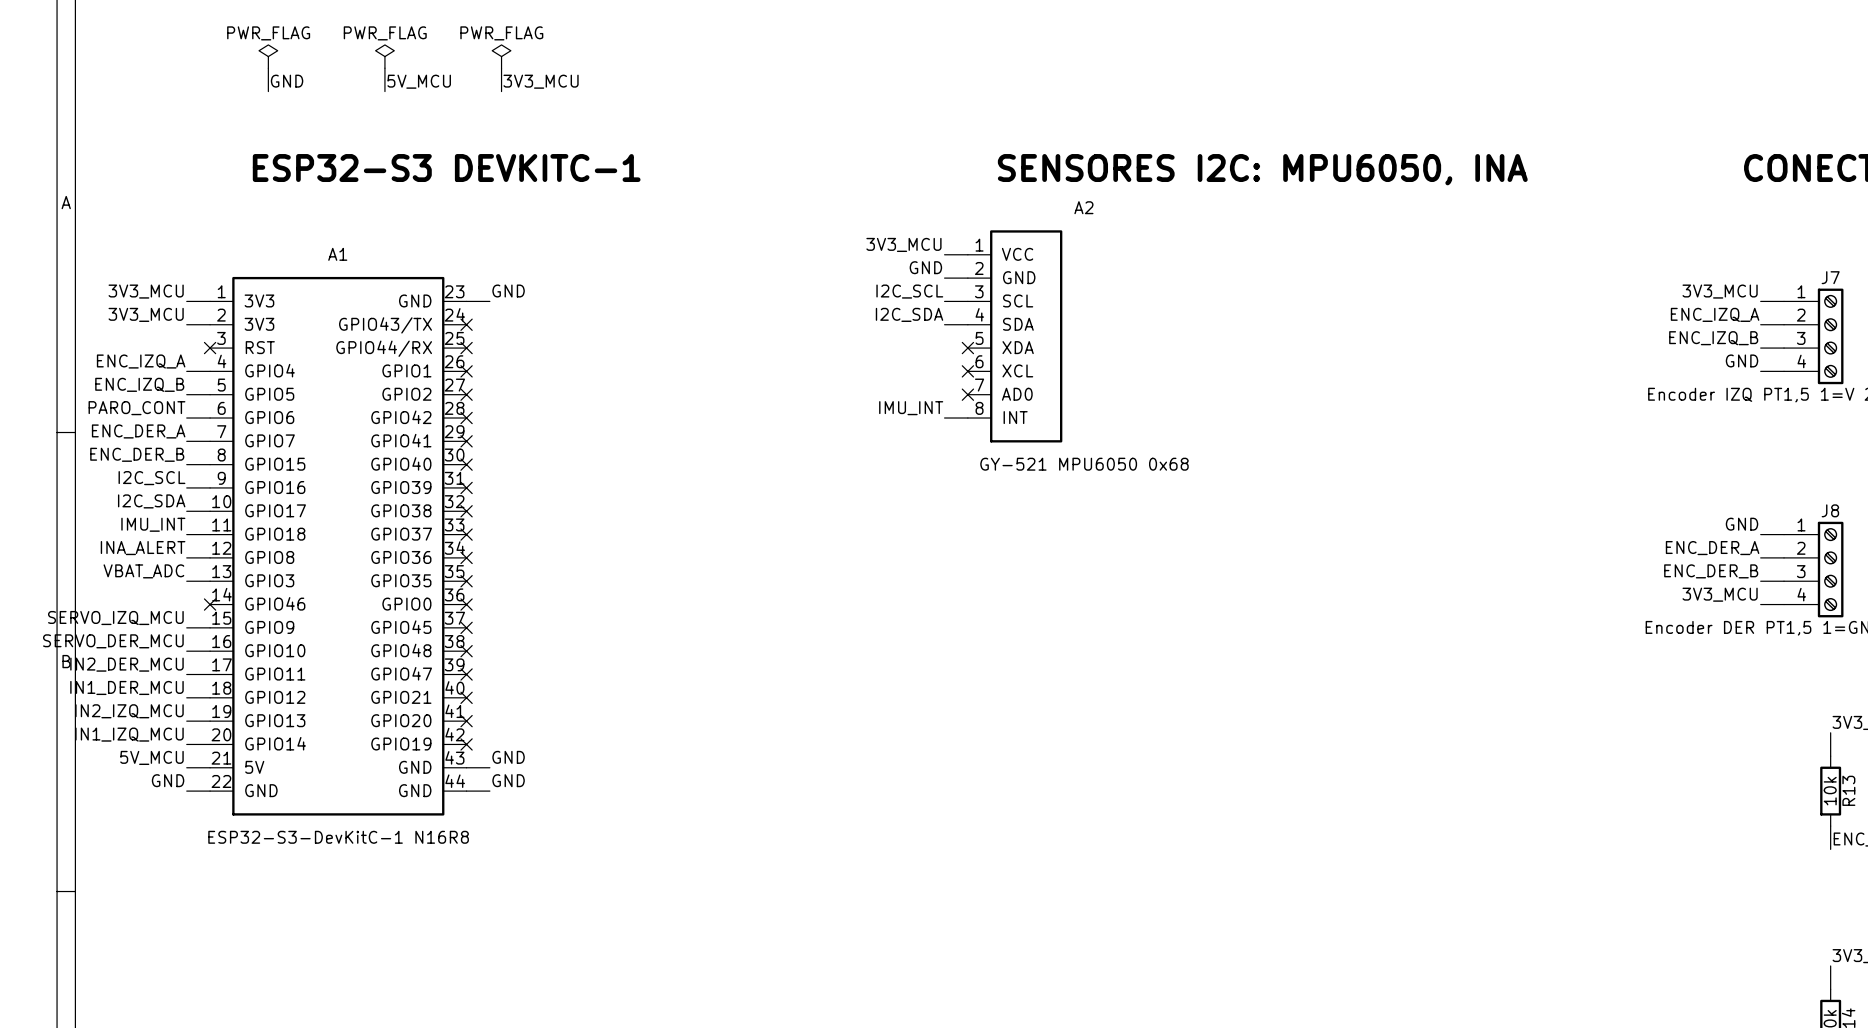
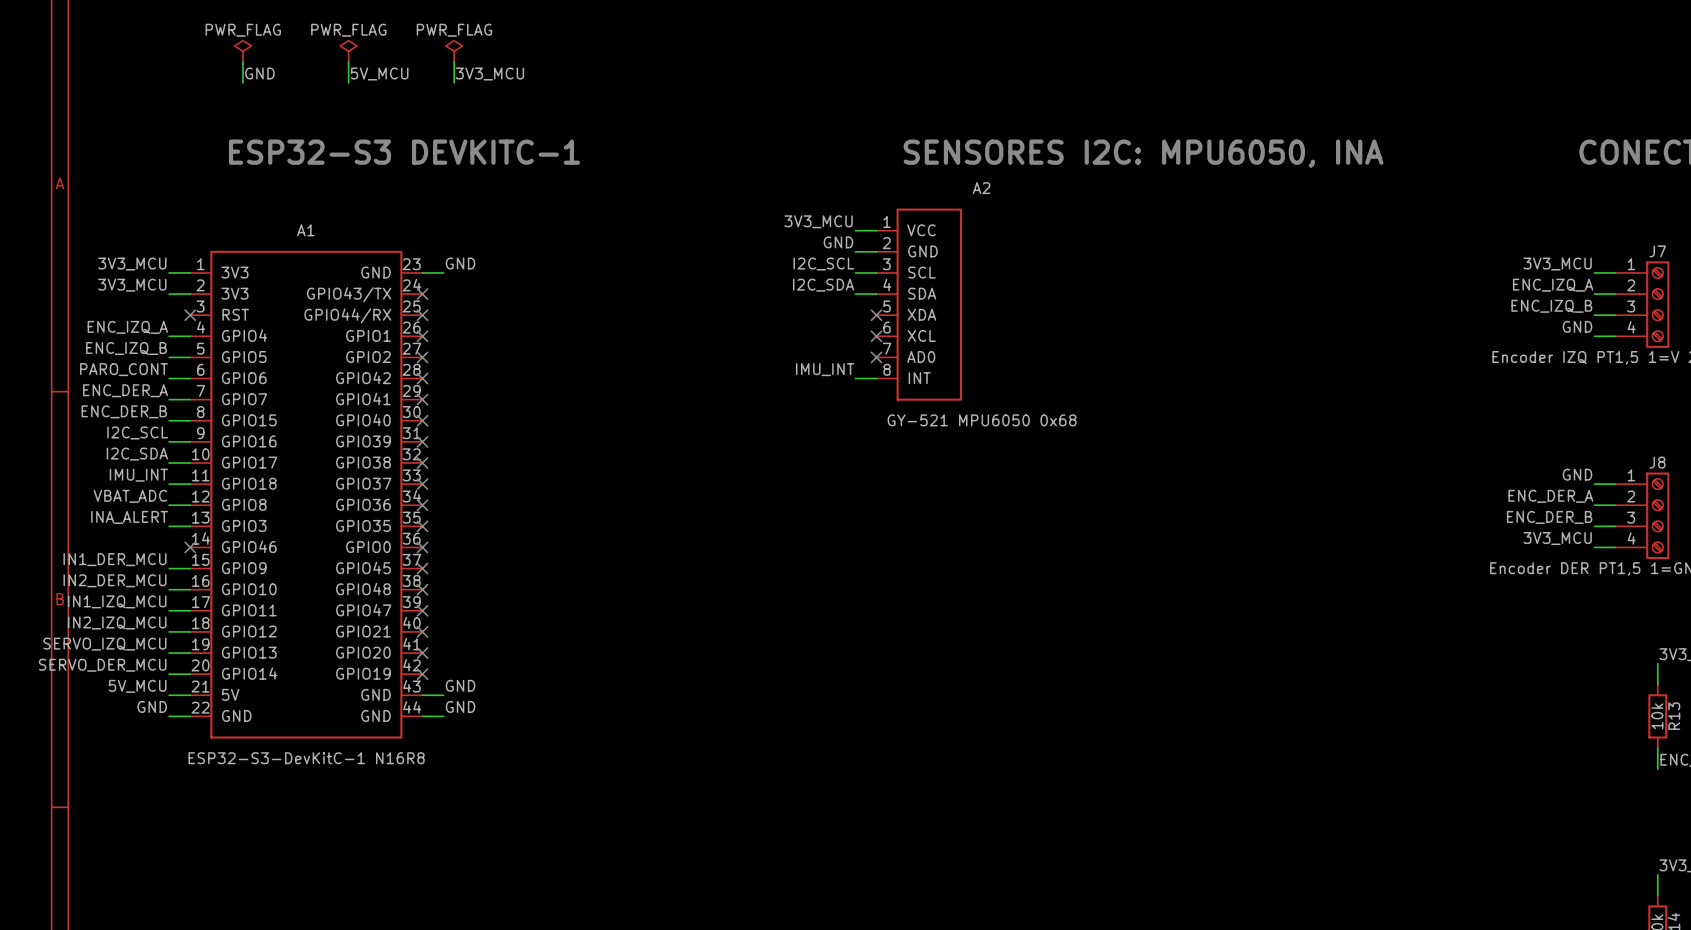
label: INA_ALERT (143, 548) -> VBAT_ADC (130, 496)
label: VBAT_ADC (143, 571) -> INA_ALERT (129, 517)
label: SERVO_IZQ_MCU (115, 618) -> IN1_DER_MCU (114, 559)
label: SERVO_DER_MCU (113, 641) -> IN2_DER_MCU (114, 580)
label: IN2_DER_MCU (126, 664) -> IN1_IZQ_MCU (117, 601)
label: IN1_DER_MCU (126, 687) -> IN2_IZQ_MCU (117, 623)
label: IN2_IZQ_MCU (129, 711) -> SERVO_IZQ_MCU (104, 644)
label: IN1_IZQ_MCU (129, 734) -> SERVO_DER_MCU (102, 665)

